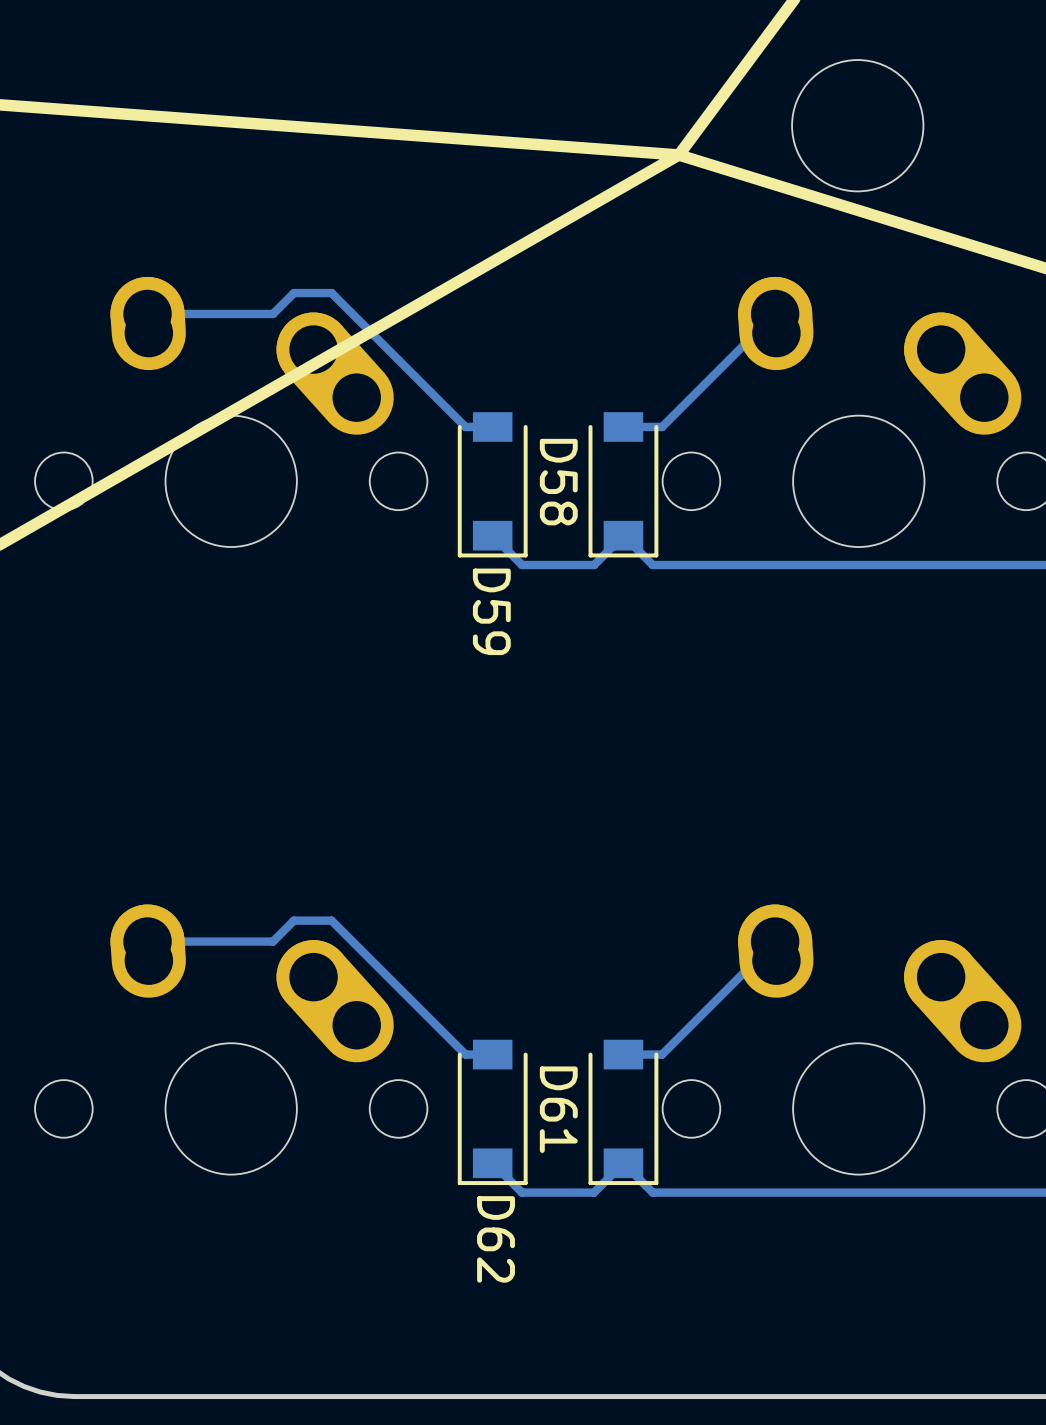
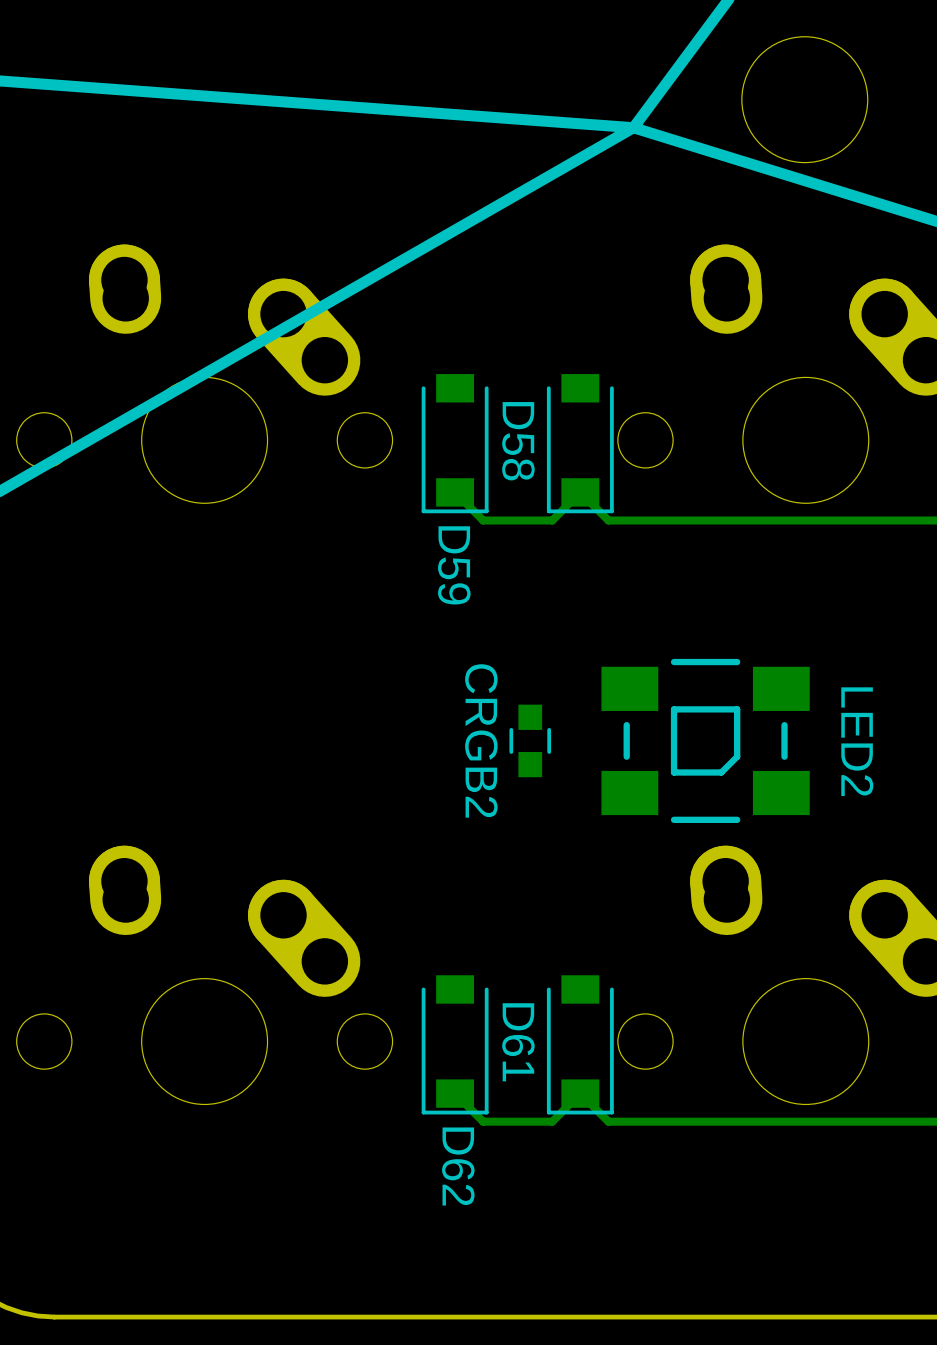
track: (147, 313) (273, 313) (293, 293) (331, 293) (465, 426) (492, 426) -> none
track: (775, 313) (662, 426) (623, 426) -> none
CRGB2: none -> (530, 740)
LED2: none -> (705, 740)
track: (147, 941) (273, 941) (293, 920) (331, 920) (465, 1054) (492, 1054) -> none
track: (775, 941) (662, 1054) (623, 1054) -> none

